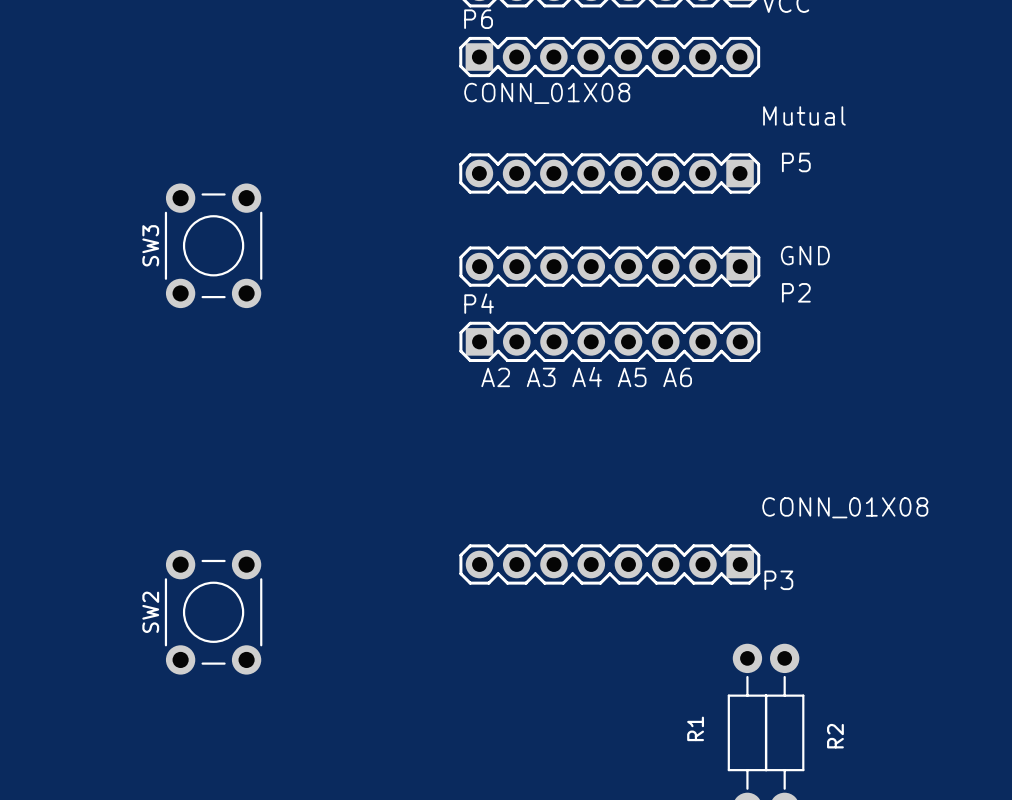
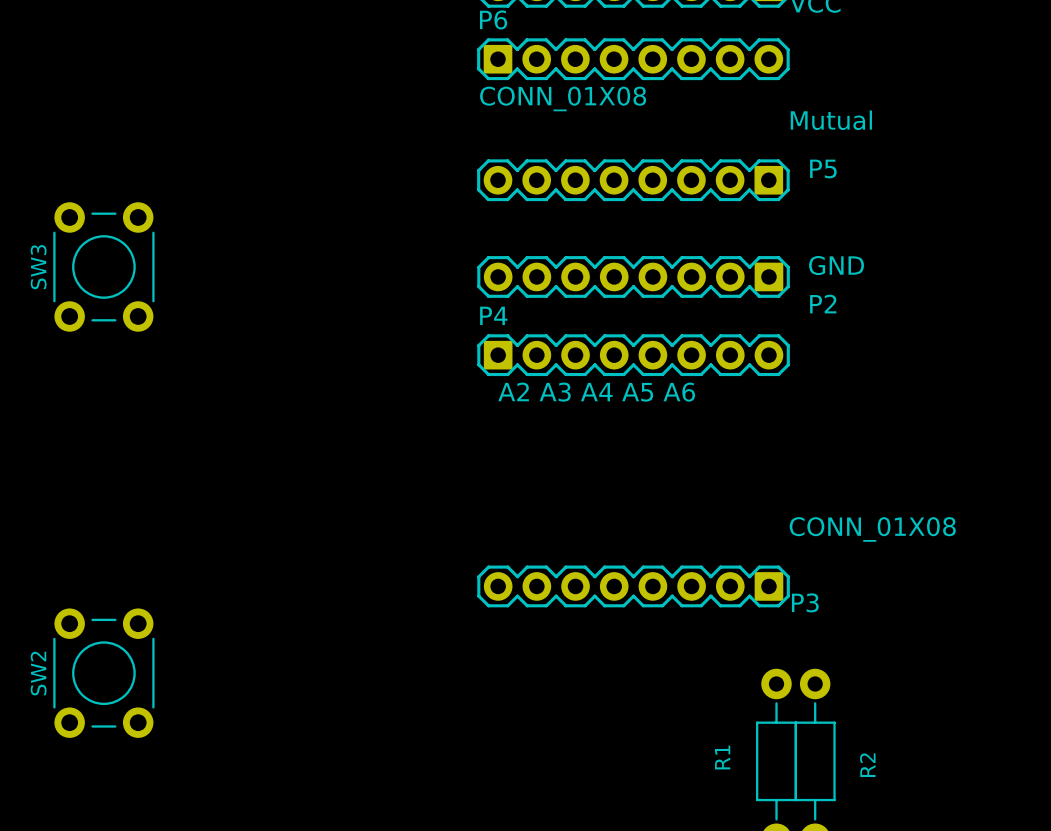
SW3 position: (213, 245) -> (103, 266)
SW2 position: (213, 612) -> (103, 673)

